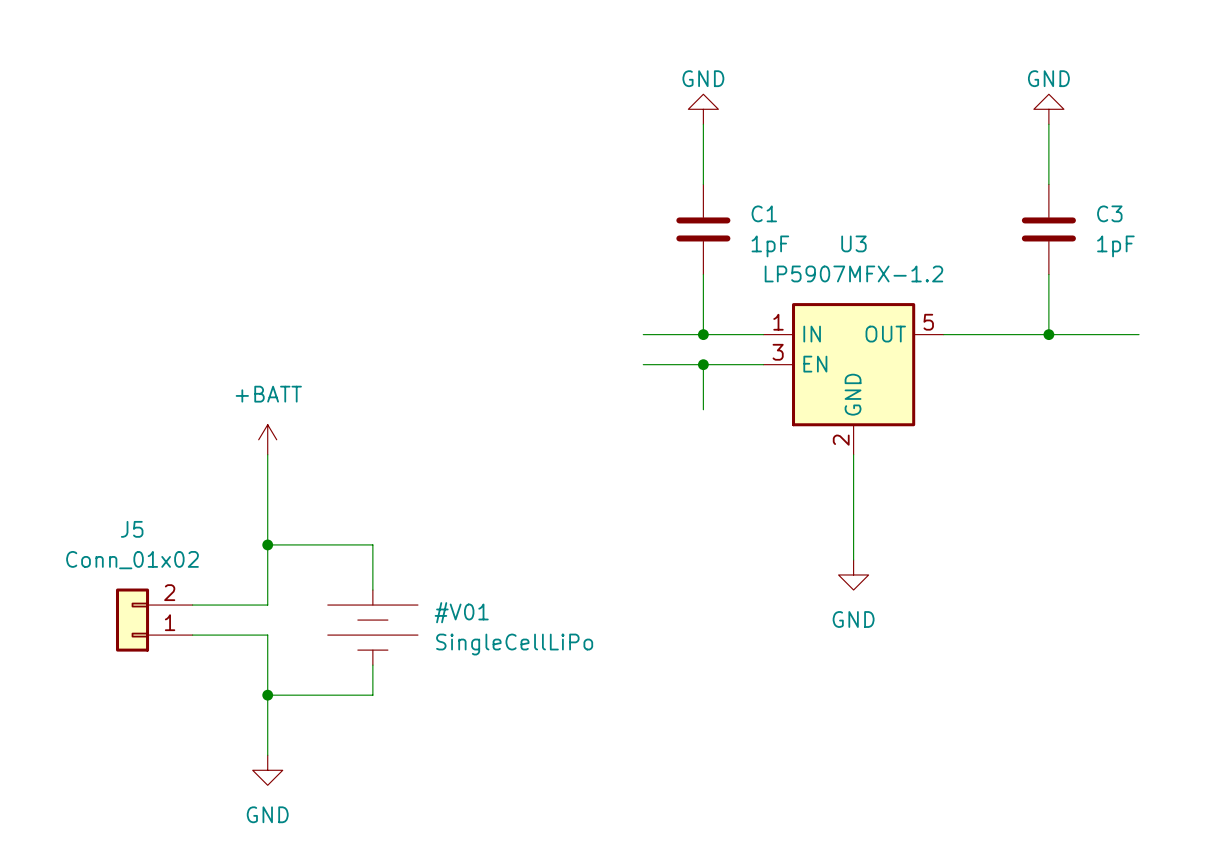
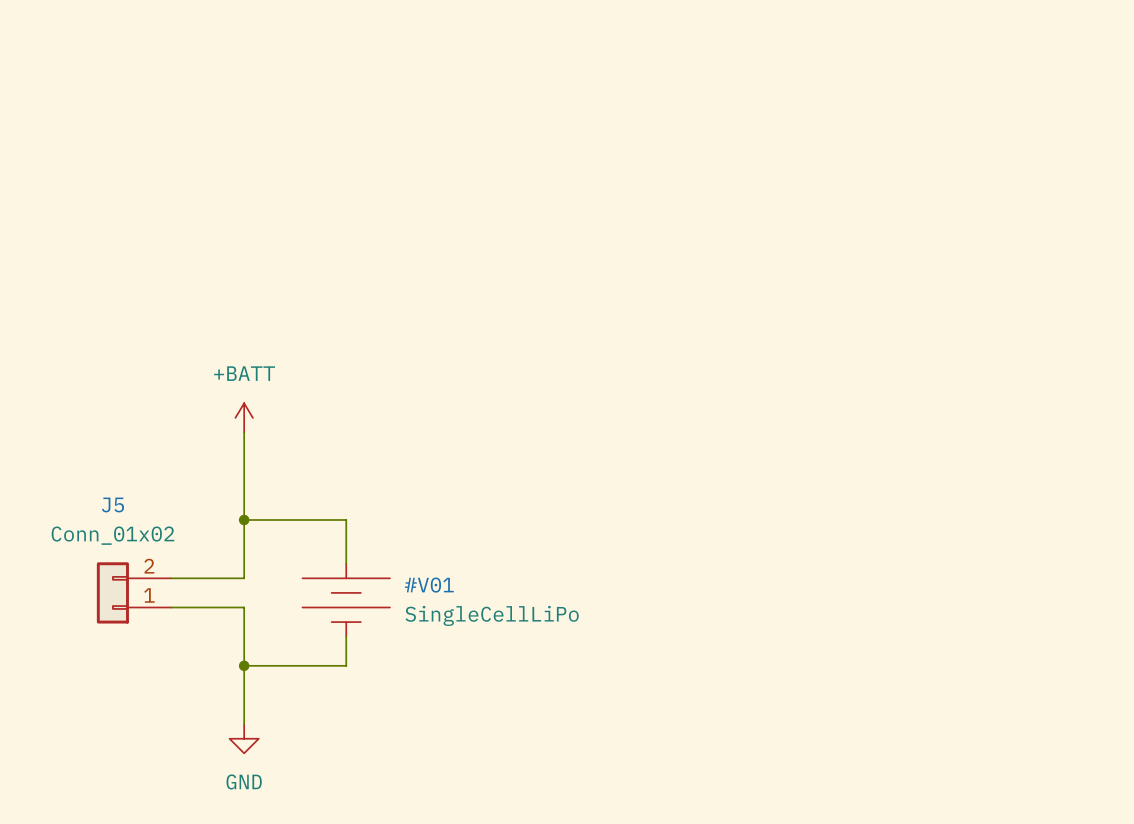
power symbol: GND (703, 109) -> none
power symbol: GND (1048, 109) -> none
wire: (703, 124) (703, 184) -> none
wire: (1048, 124) (1048, 184) -> none
C1: 1pF (703, 229) -> none
C3: 1pF (1048, 229) -> none
wire: (703, 274) (703, 334) -> none
wire: (1048, 274) (1048, 334) -> none
wire: (643, 334) (763, 334) -> none
junction: (703, 334) -> none
wire: (943, 334) (1139, 334) -> none
junction: (1048, 334) -> none
wire: (643, 364) (763, 364) -> none
wire: (703, 364) (703, 409) -> none
junction: (703, 364) -> none
U3: LP5907MFX-1.2 (853, 378) -> none
wire: (853, 454) (853, 559) -> none
power symbol: GND (853, 574) -> none

